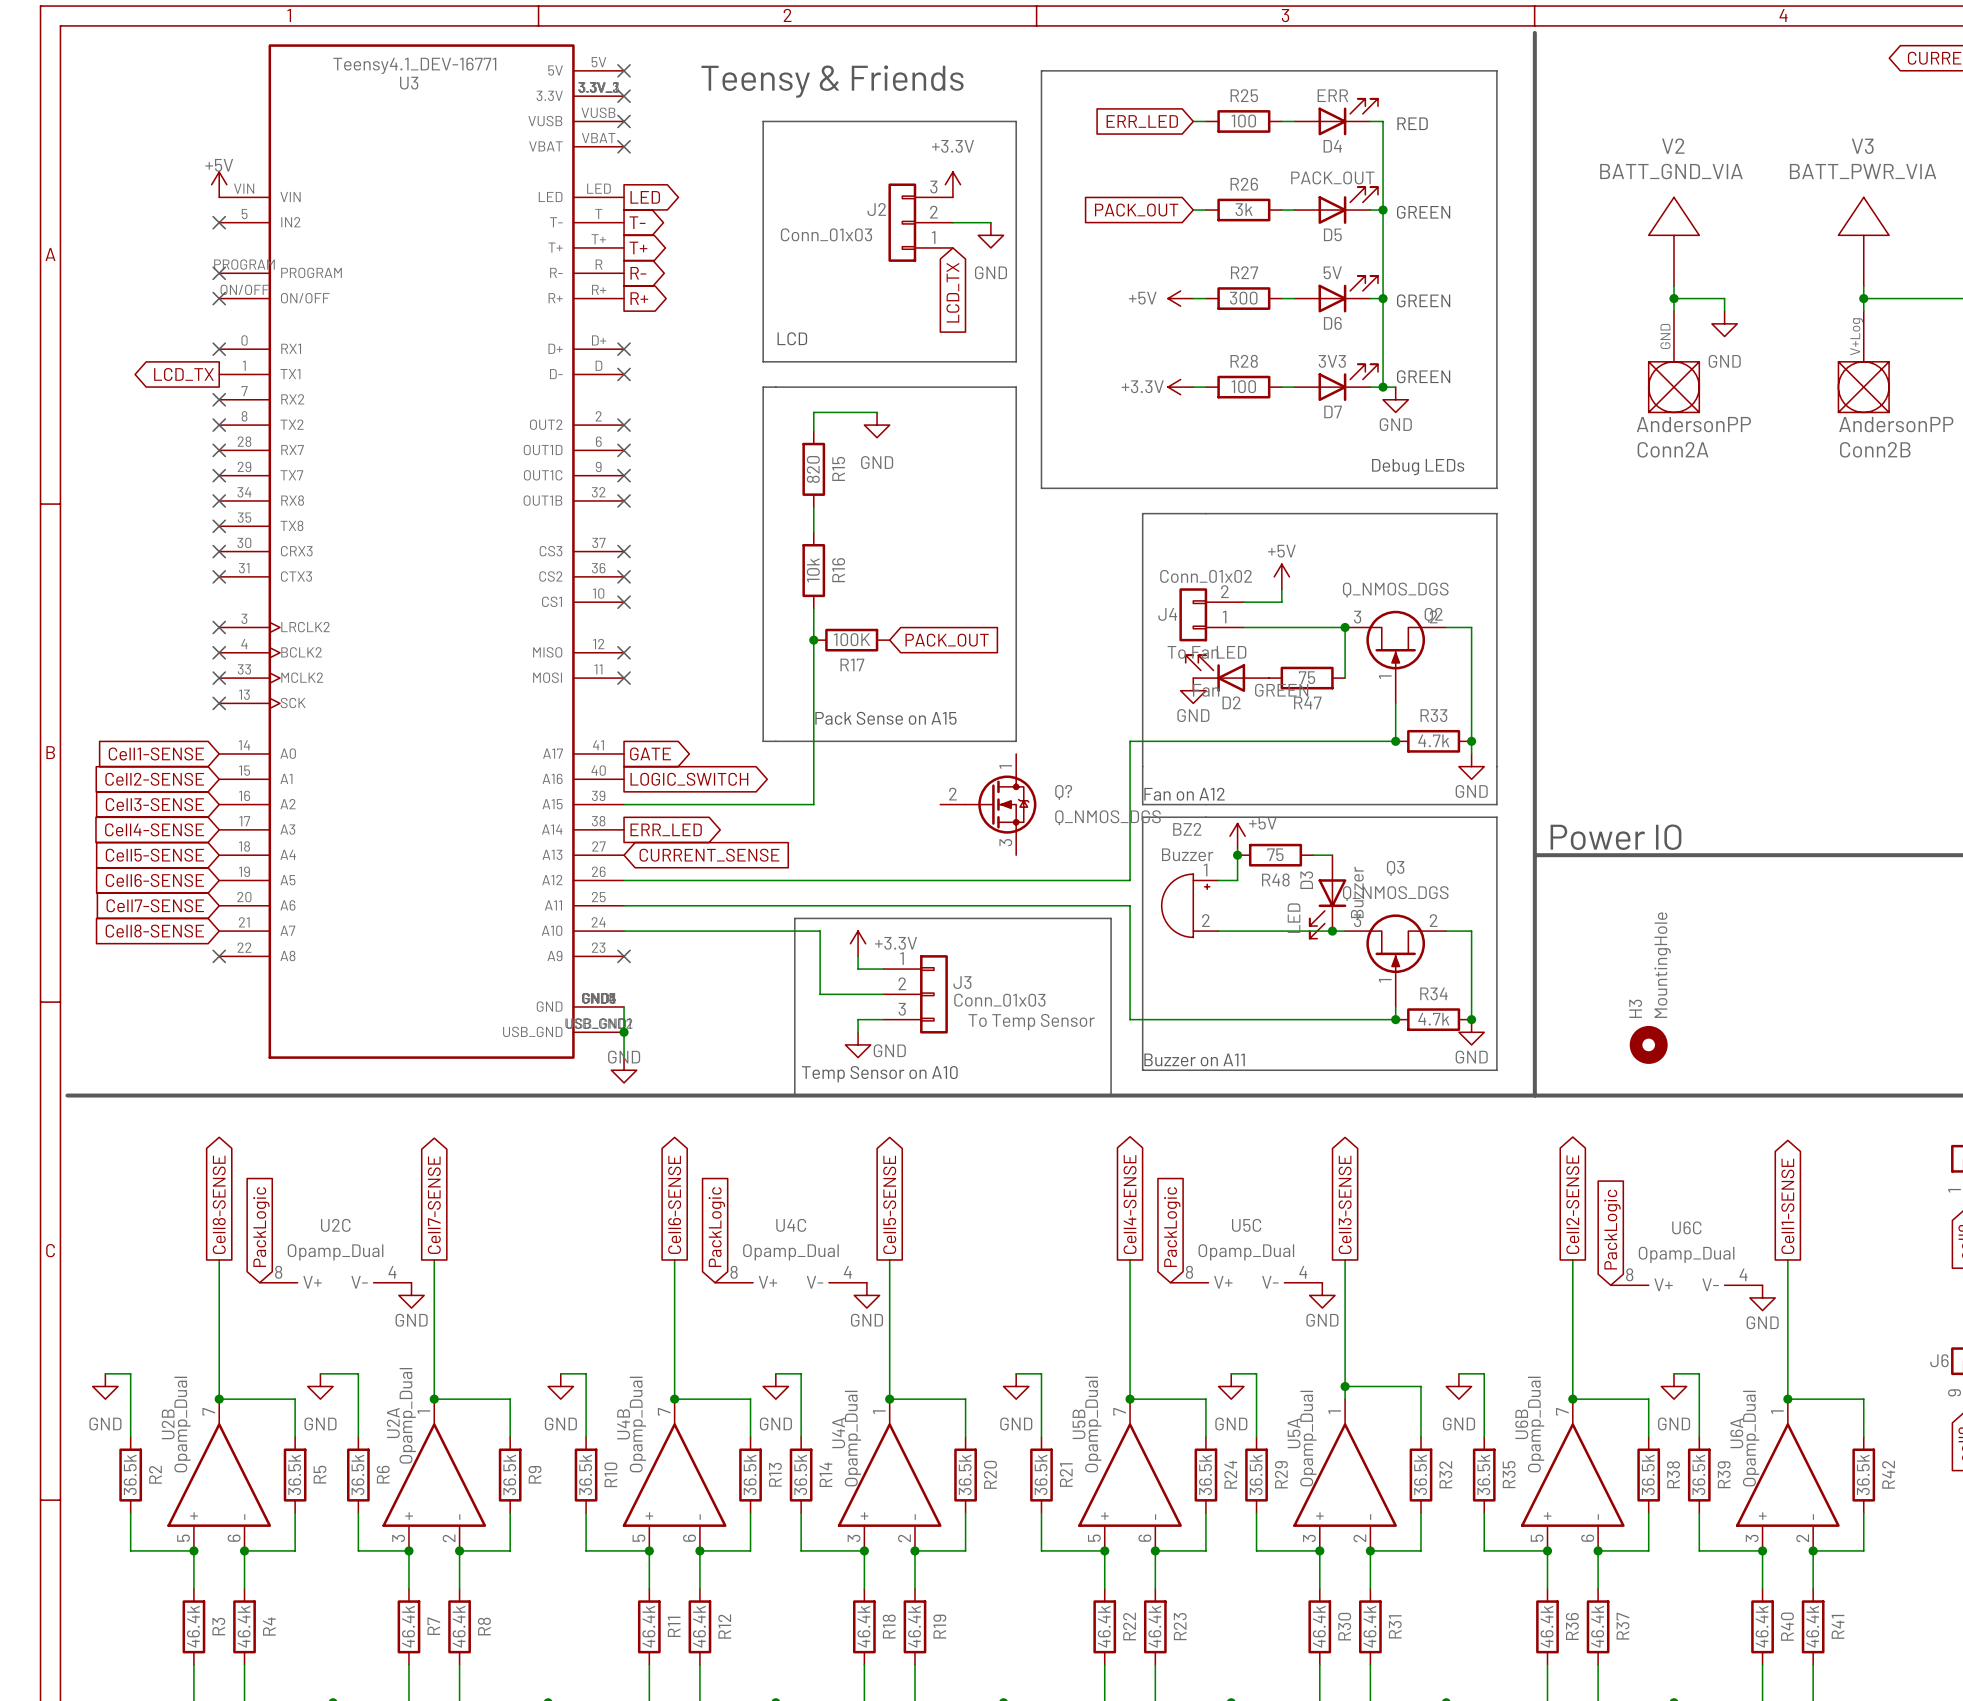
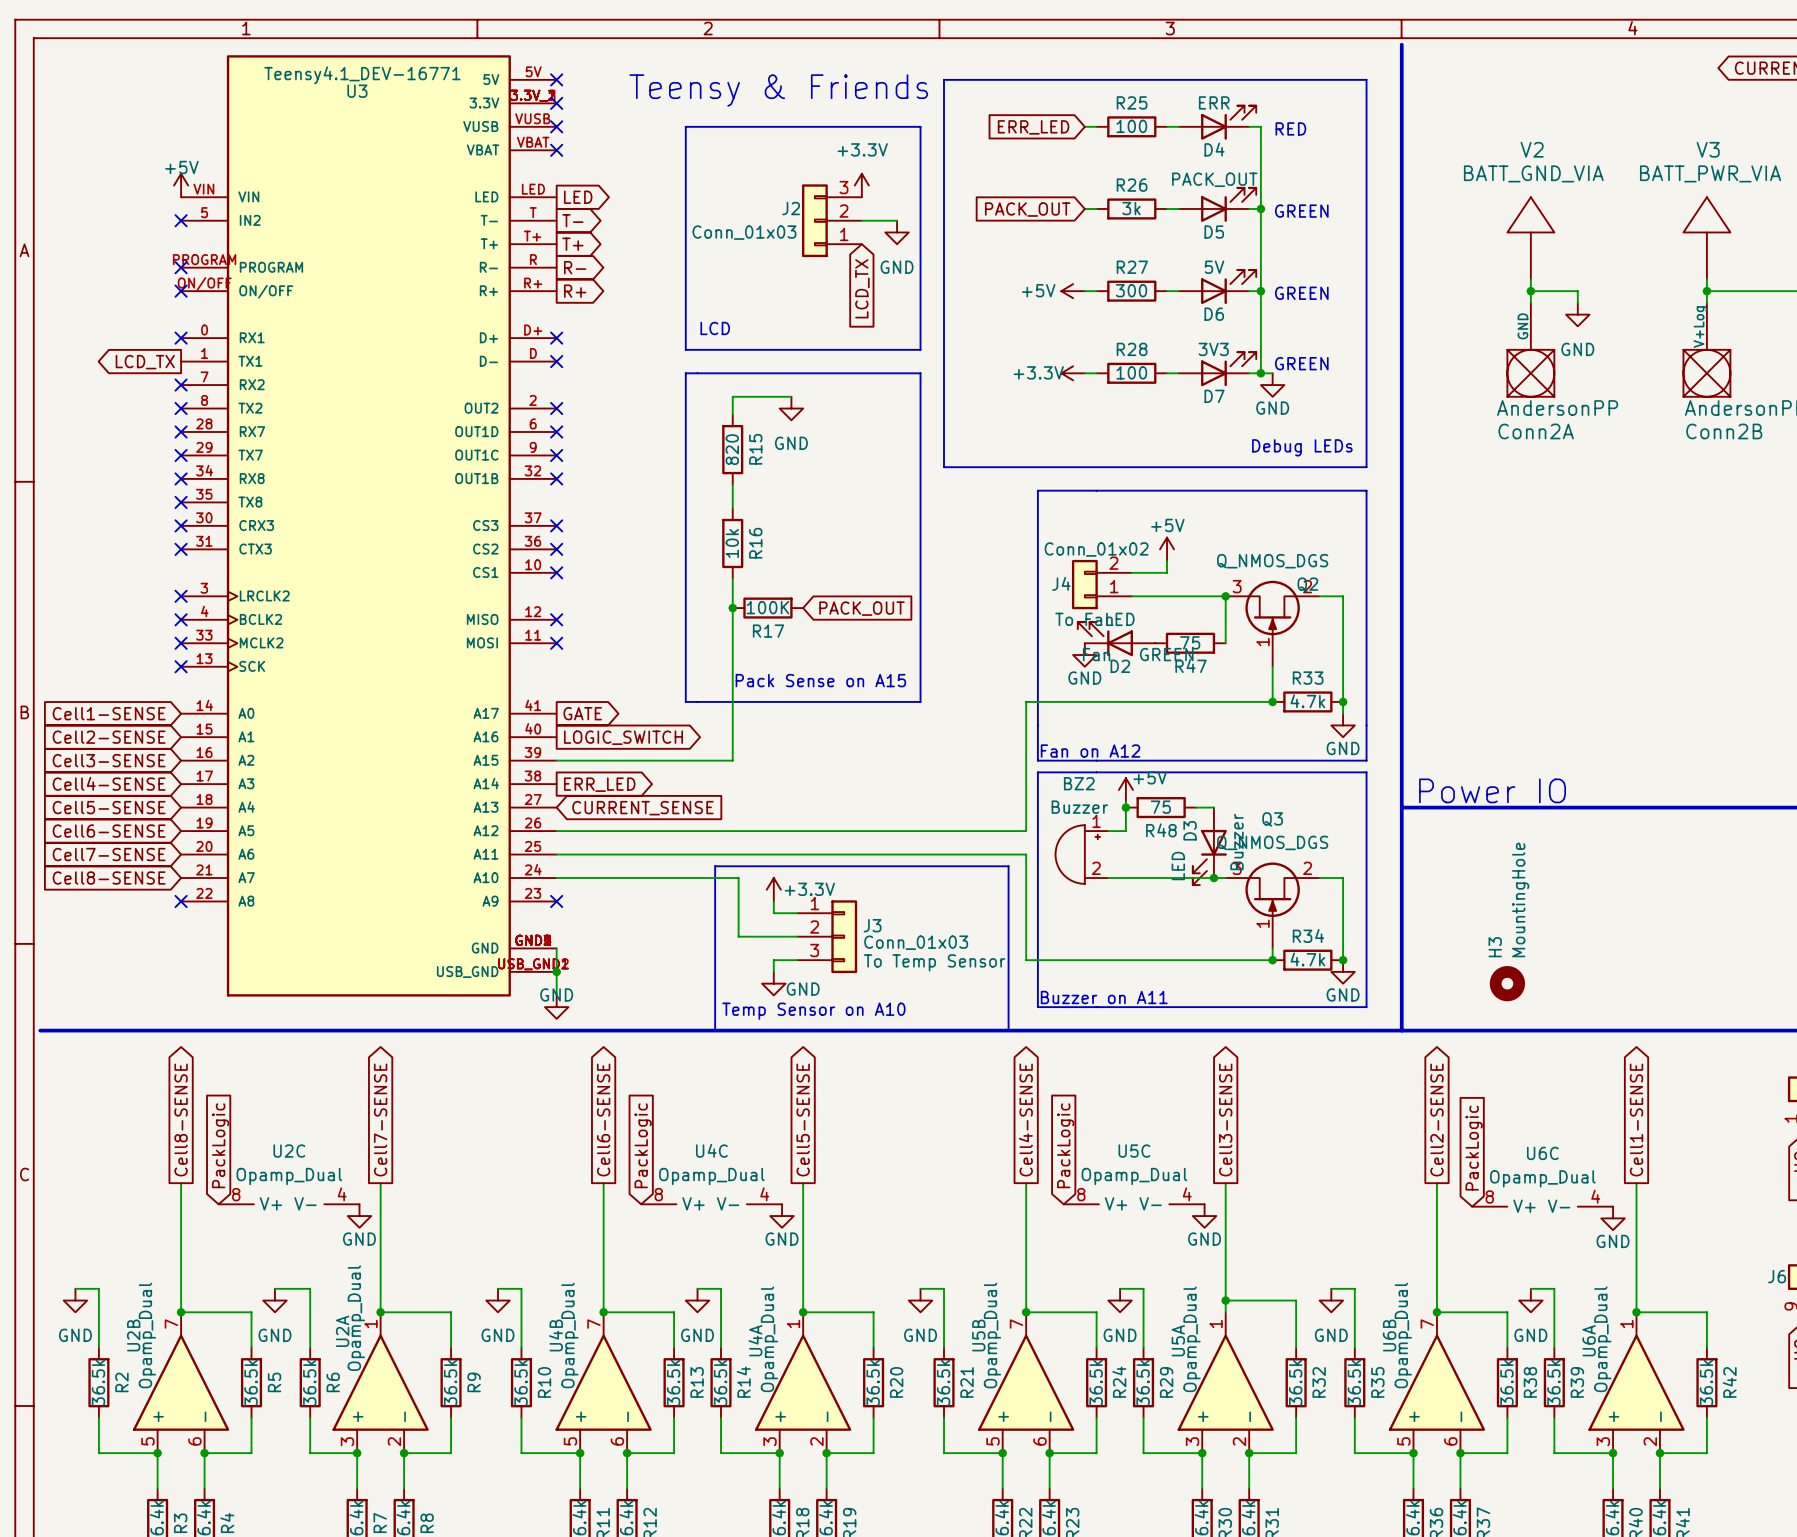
Q?: Q_NMOS_DGS (988, 804) -> none

